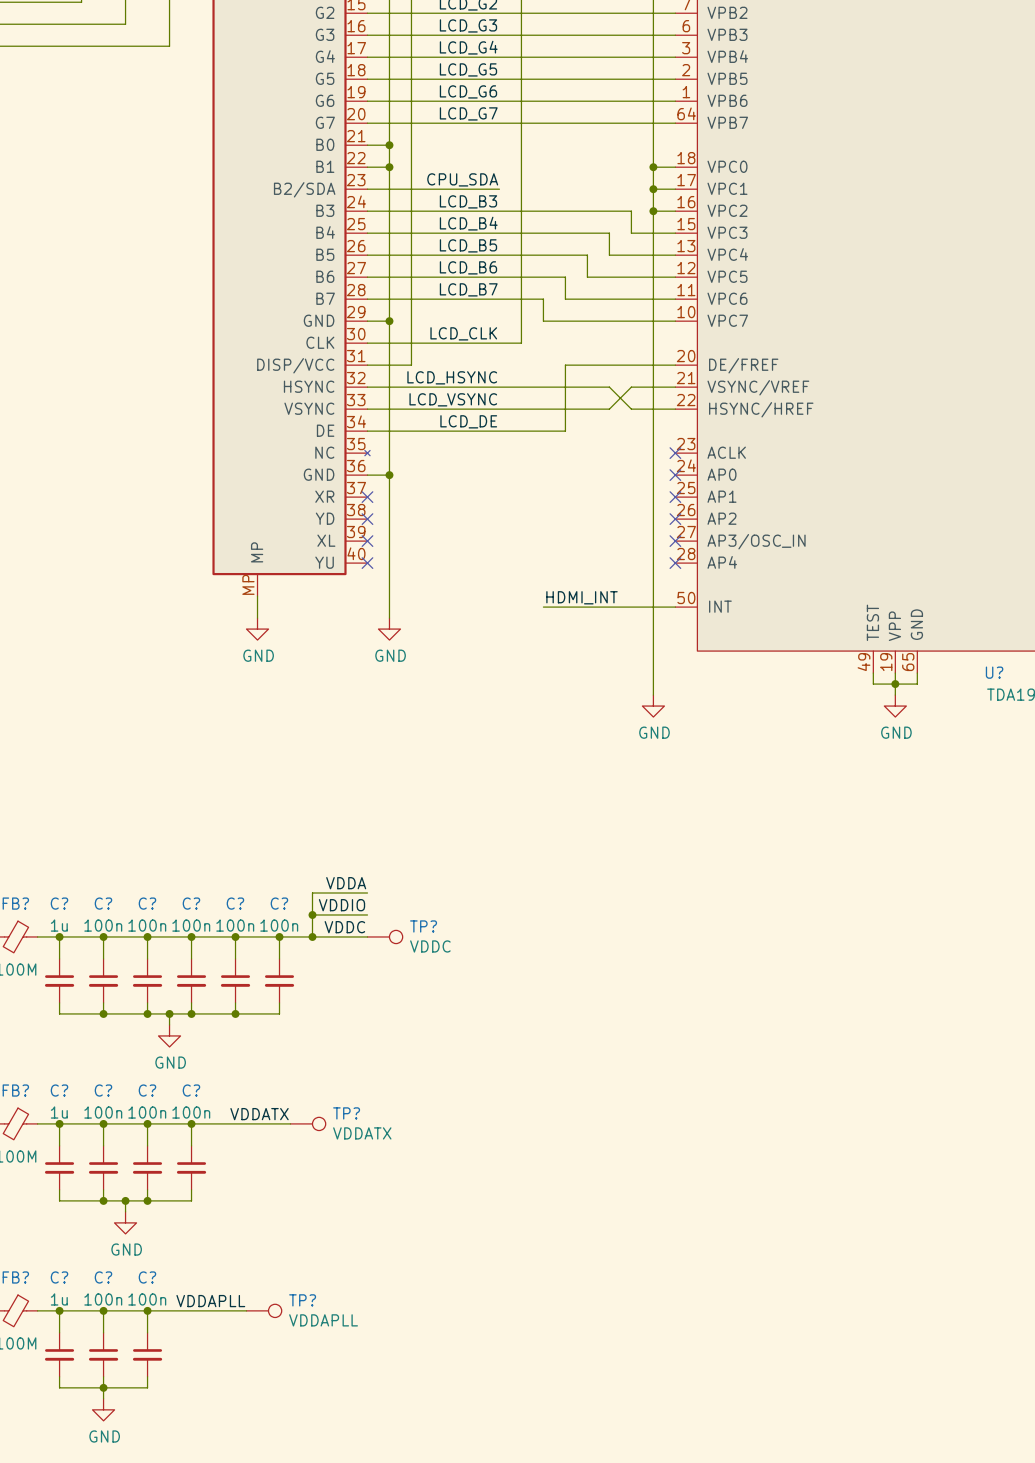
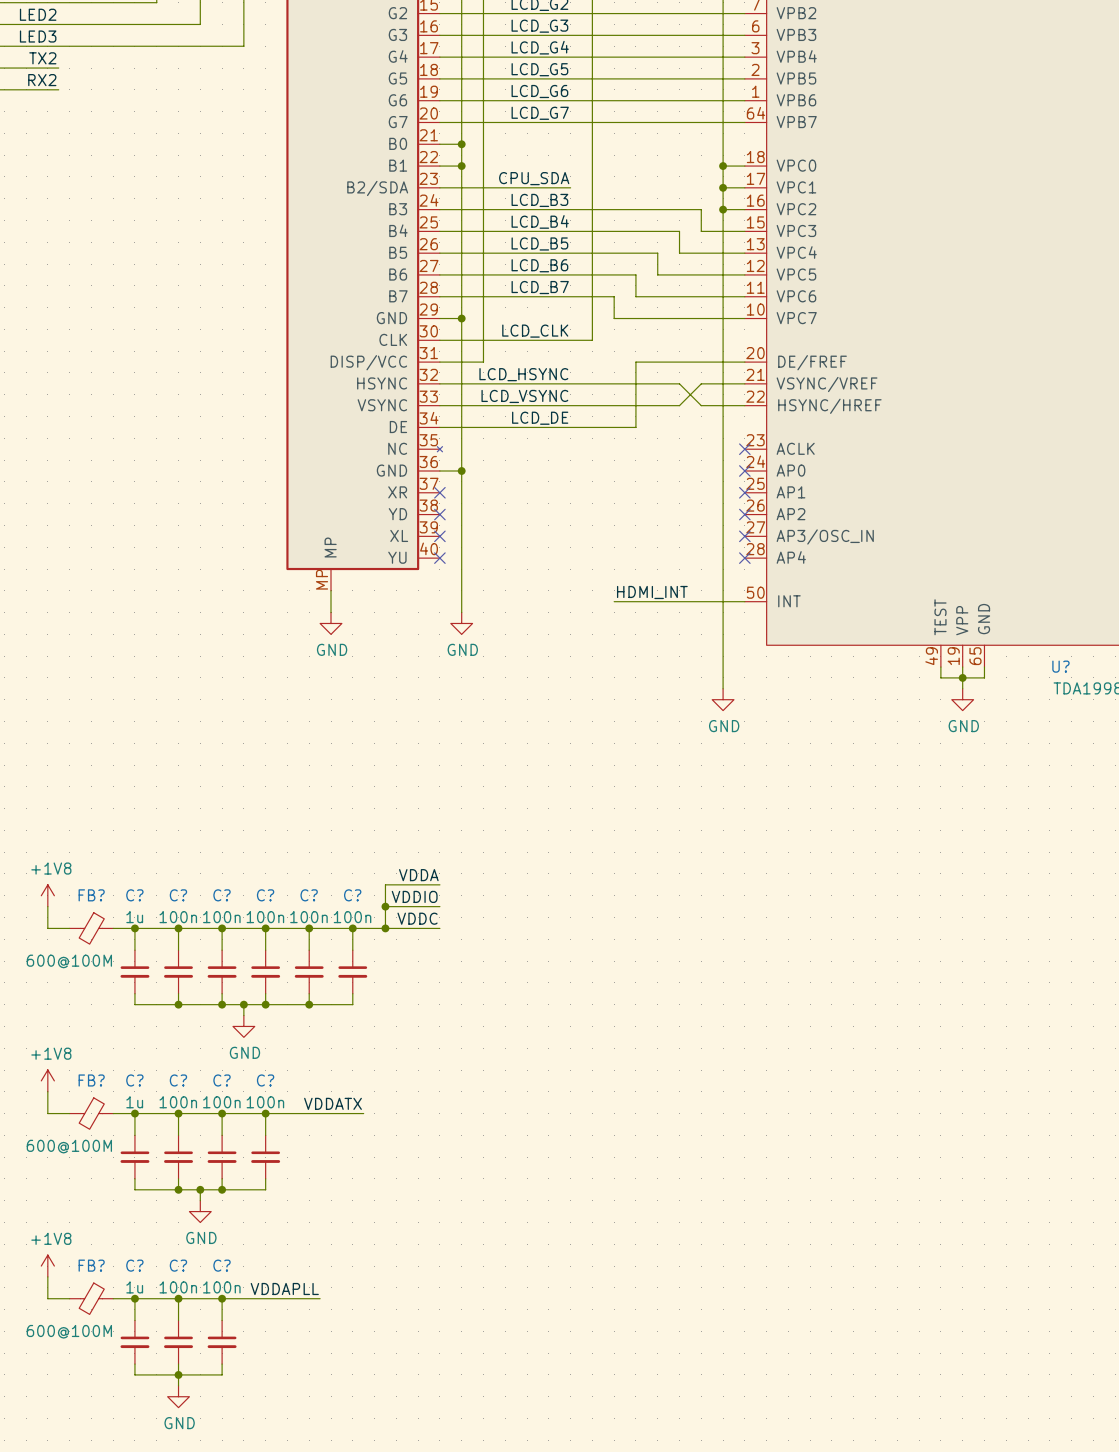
TP?: VDDC (385, 936) -> none
TP?: VDDATX (308, 1123) -> none
TP?: VDDAPLL (264, 1310) -> none

